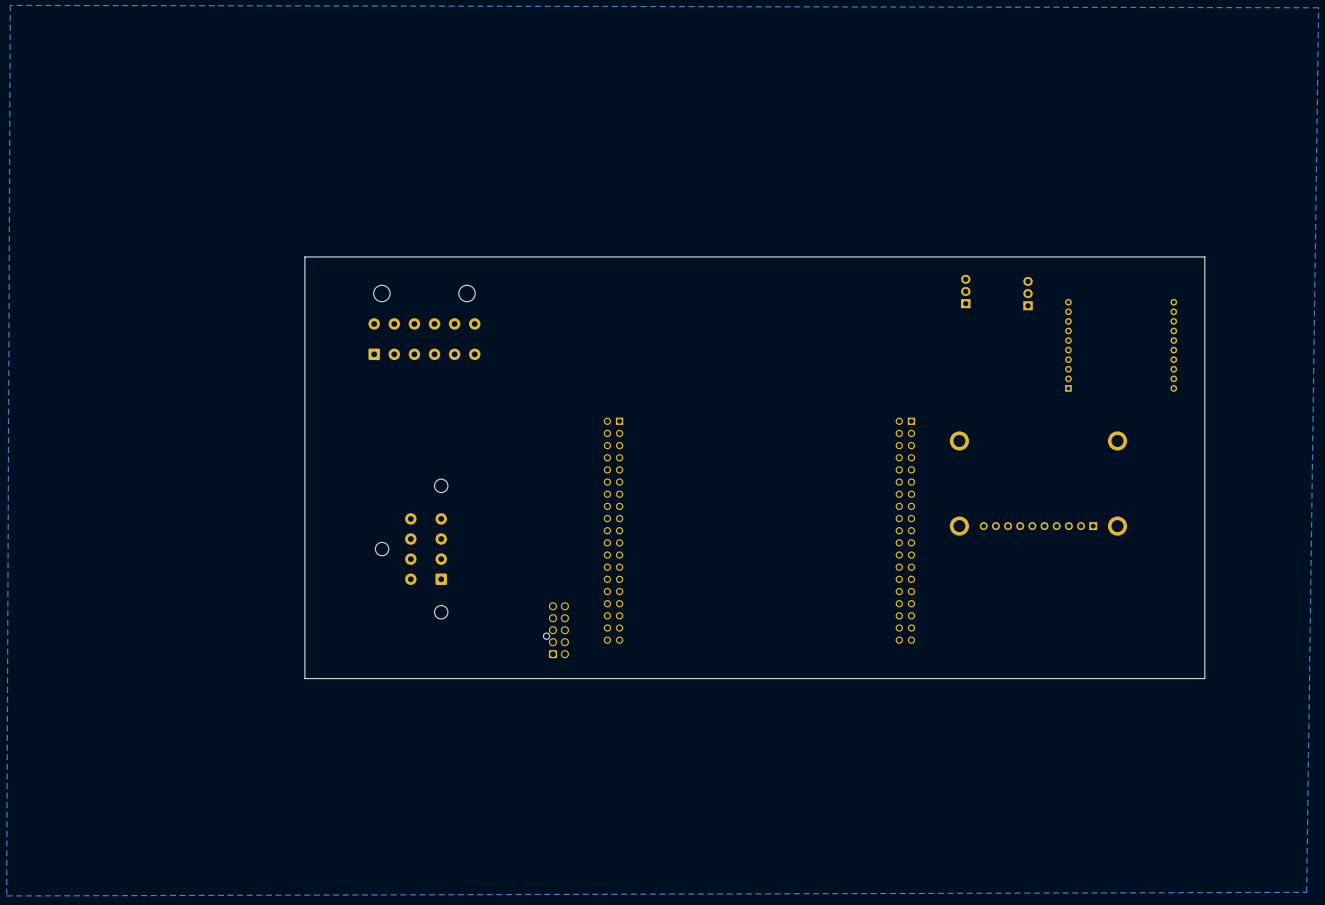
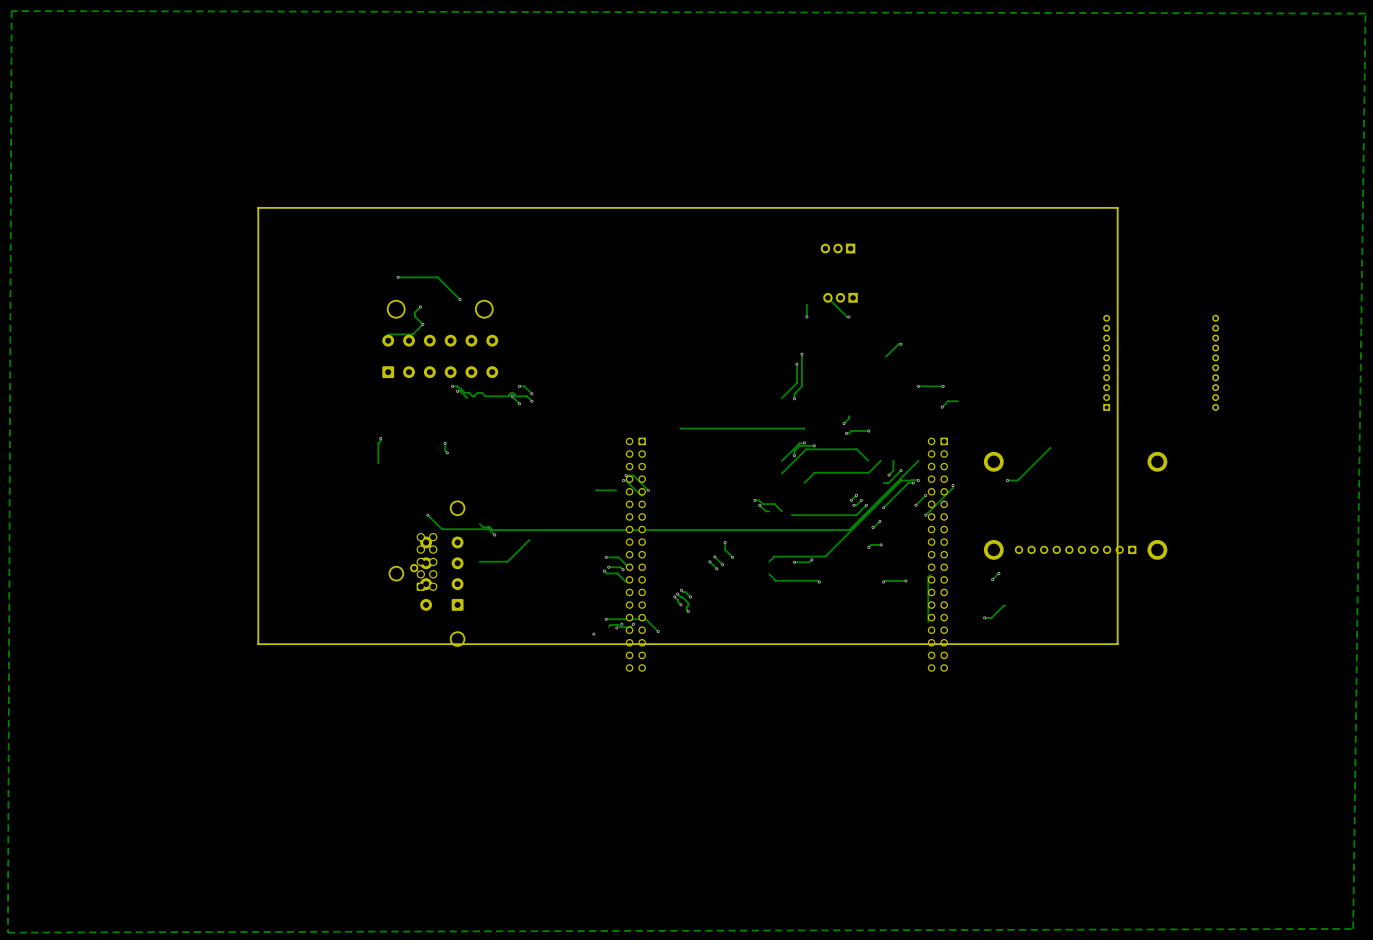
part: none -> (838, 248)
board edge: (1204, 256) (304, 256) (304, 678) (1204, 678) (1204, 256) -> (1117, 207) (1117, 644) (258, 644) (258, 207) (1117, 207)
track: none -> (398, 277) (437, 277) (460, 299)
via: none -> (398, 277)
track: none -> (827, 297) (849, 317)
part: none -> (840, 297)
via: none -> (460, 299)
track: none -> (806, 304) (806, 317)
track: none -> (420, 307) (414, 312) (414, 316) (422, 324) (412, 334) (388, 334)
via: none -> (420, 307)
part: (965, 291) -> none
part: (1028, 293) -> none
via: none -> (806, 317)
via: none -> (849, 317)
via: none -> (422, 324)
track: none -> (901, 344) (898, 344) (886, 356)
via: none -> (901, 344)
track: none -> (801, 354) (801, 386) (794, 393) (794, 398)
via: none -> (801, 354)
track: none -> (796, 364) (796, 383) (781, 398)
via: none -> (796, 364)
track: none -> (452, 386) (457, 386) (472, 396) (477, 392) (482, 392) (485, 396) (509, 396) (513, 393) (515, 396) (526, 396) (531, 401)
via: none -> (452, 386)
track: none -> (519, 386) (524, 386) (531, 393)
via: none -> (519, 386)
via: none -> (918, 386)
track: none -> (943, 386) (918, 386)
via: none -> (943, 386)
track: none -> (457, 391) (460, 391) (467, 398)
via: none -> (457, 391)
via: none -> (531, 393)
track: none -> (512, 396) (519, 403)
via: none -> (512, 396)
via: none -> (794, 398)
via: none -> (531, 401)
track: none -> (958, 401) (948, 401) (942, 407)
via: none -> (519, 403)
via: none -> (942, 407)
track: none -> (849, 416) (844, 423)
via: none -> (844, 423)
track: none -> (804, 428) (680, 428)
track: none -> (868, 430) (851, 430) (846, 433)
via: none -> (868, 430)
via: none -> (846, 433)
track: none -> (380, 438) (378, 443) (378, 463)
via: none -> (380, 438)
track: none -> (804, 442) (799, 443) (781, 461)
via: none -> (804, 442)
track: none -> (445, 443) (445, 450) (447, 452)
via: none -> (445, 443)
track: none -> (814, 445) (799, 445) (794, 451) (794, 455)
via: none -> (814, 445)
track: none -> (1050, 447) (1017, 480) (1007, 480)
via: none -> (447, 452)
via: none -> (794, 455)
track: none -> (868, 460) (856, 449) (806, 449) (781, 473)
track: none -> (880, 460) (868, 472) (814, 472) (804, 483)
track: none -> (893, 460) (893, 470) (889, 475)
track: none -> (918, 460) (849, 530) (492, 530) (489, 527) (483, 527) (479, 523)
track: none -> (901, 470) (888, 483) (883, 483)
via: none -> (901, 470)
via: none -> (889, 475)
track: none -> (626, 475) (633, 475) (648, 490)
via: none -> (626, 475)
track: none -> (623, 480) (643, 495)
via: none -> (623, 480)
track: none -> (918, 480) (901, 480) (825, 556) (774, 556) (769, 561)
via: none -> (918, 480)
via: none -> (1007, 480)
track: none -> (913, 483) (908, 483) (883, 507)
via: none -> (913, 483)
track: none -> (953, 485) (953, 487) (925, 515)
via: none -> (953, 485)
track: none -> (616, 490) (596, 490)
via: none -> (648, 490)
track: none -> (856, 495) (851, 500)
via: none -> (856, 495)
track: none -> (925, 495) (915, 505)
via: none -> (925, 495)
track: none -> (754, 500) (759, 500) (762, 504) (774, 504) (781, 511)
via: none -> (754, 500)
via: none -> (851, 500)
track: none -> (861, 500) (853, 505)
via: none -> (861, 500)
track: none -> (759, 505) (765, 511) (769, 511)
via: none -> (759, 505)
via: none -> (853, 505)
track: none -> (866, 505) (856, 515) (792, 514)
via: none -> (866, 505)
via: none -> (915, 505)
via: none -> (883, 507)
track: none -> (427, 515) (441, 529) (488, 529) (494, 535)
via: none -> (427, 515)
via: none -> (925, 515)
track: none -> (879, 521) (872, 527)
via: none -> (879, 521)
via: none -> (872, 527)
via: none -> (494, 535)
track: none -> (529, 539) (507, 561) (479, 561)
track: none -> (725, 542) (725, 549) (732, 557)
via: none -> (725, 542)
track: none -> (881, 544) (871, 544) (868, 547)
via: none -> (881, 544)
via: none -> (868, 547)
track: none -> (714, 556) (722, 564)
via: none -> (714, 556)
track: none -> (606, 557) (618, 557) (628, 567)
via: none -> (606, 557)
via: none -> (732, 557)
track: none -> (811, 559) (809, 562) (794, 562)
via: none -> (811, 559)
part: none -> (424, 561)
track: none -> (709, 561) (716, 568)
via: none -> (709, 561)
via: none -> (794, 562)
via: none -> (722, 564)
track: none -> (608, 567) (620, 567) (623, 569)
via: none -> (608, 567)
via: none -> (716, 568)
via: none -> (623, 569)
track: none -> (604, 571) (606, 573) (617, 573) (626, 582)
via: none -> (604, 571)
track: none -> (998, 573) (992, 579)
via: none -> (998, 573)
track: none -> (769, 574) (775, 580) (819, 582)
track: none -> (930, 574) (928, 577) (928, 621)
via: none -> (992, 579)
track: none -> (905, 580) (883, 582)
via: none -> (905, 580)
via: none -> (819, 582)
via: none -> (883, 582)
track: none -> (681, 590) (690, 596)
via: none -> (681, 590)
track: none -> (677, 594) (688, 603) (688, 611)
via: none -> (677, 594)
track: none -> (674, 596) (680, 604)
via: none -> (674, 596)
via: none -> (690, 596)
via: none -> (680, 604)
track: none -> (1005, 605) (991, 617) (984, 617)
via: none -> (688, 611)
via: none -> (984, 617)
track: none -> (606, 619) (645, 619) (658, 631)
via: none -> (606, 619)
via: none -> (621, 624)
track: none -> (633, 624) (630, 627) (620, 627) (618, 624) (608, 626)
via: none -> (633, 624)
via: none -> (616, 627)
via: none -> (658, 631)
via: none -> (593, 634)
part: (556, 630) -> none

